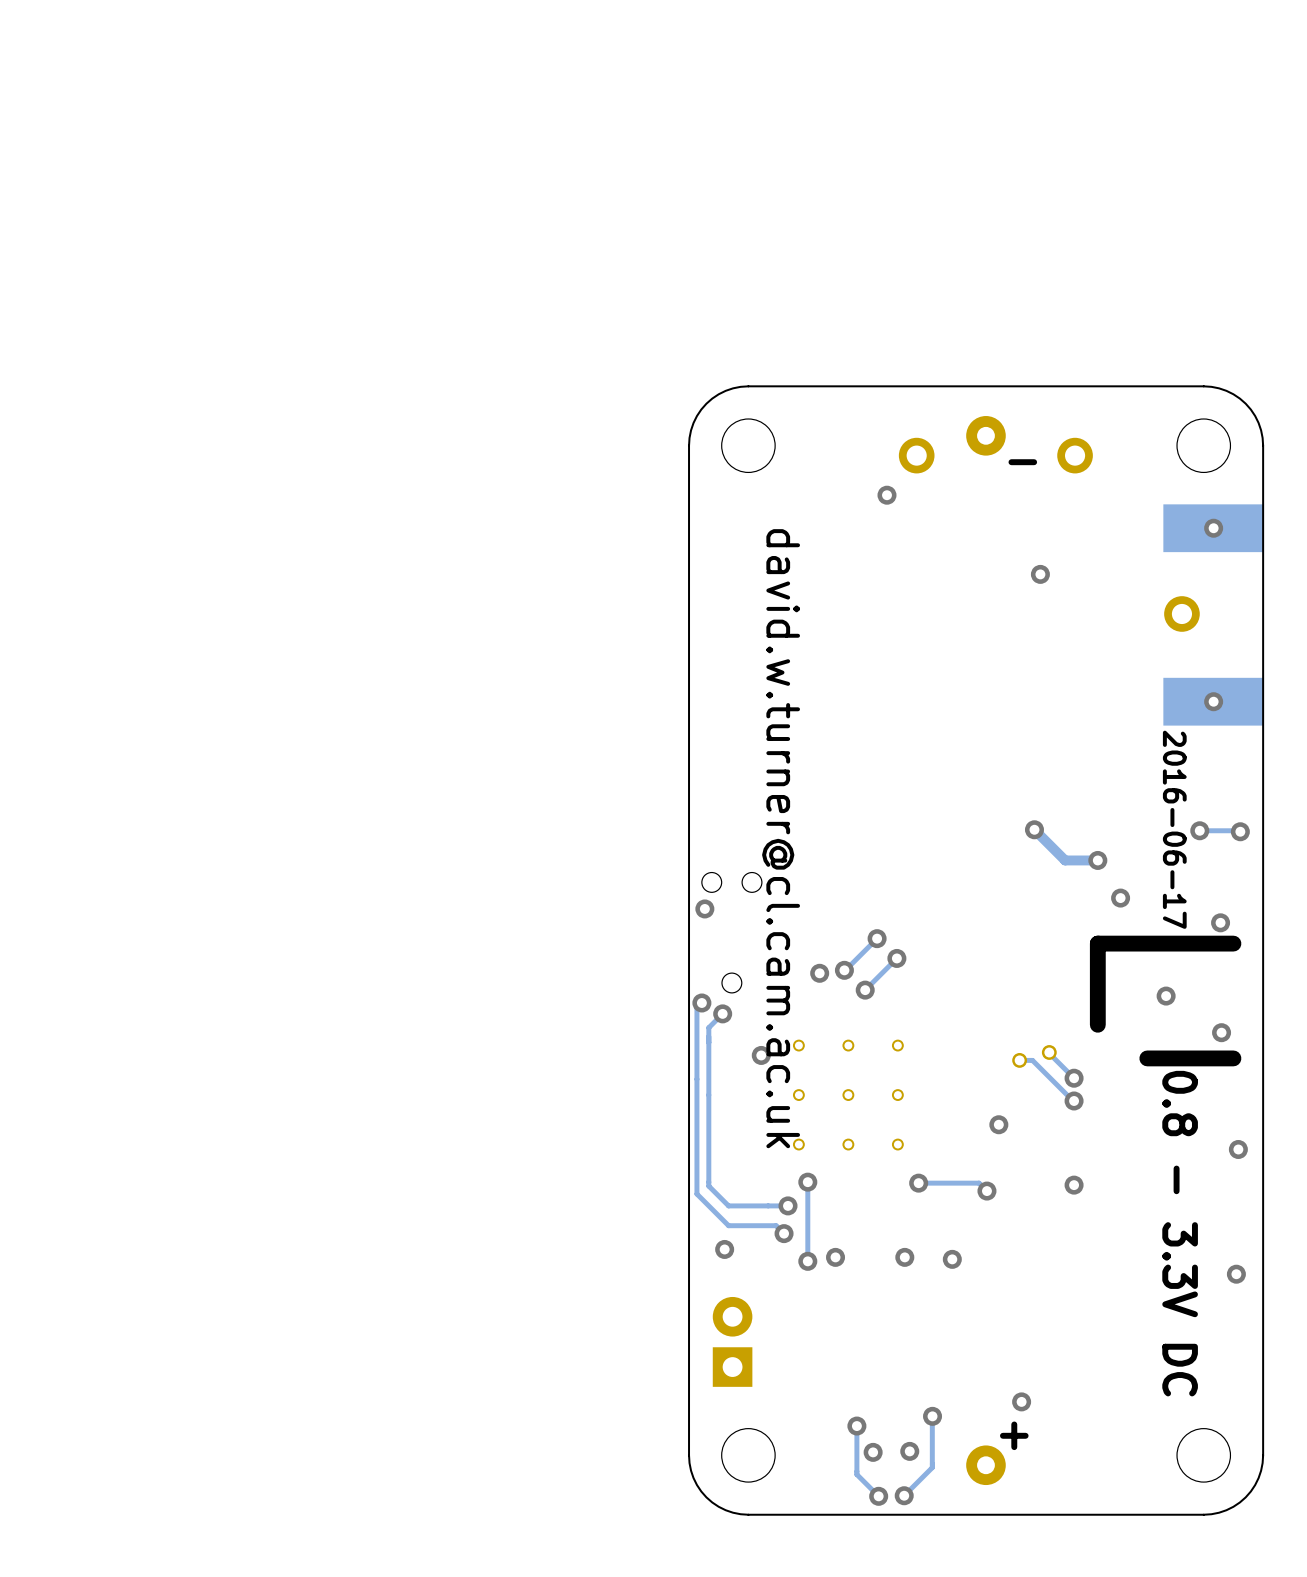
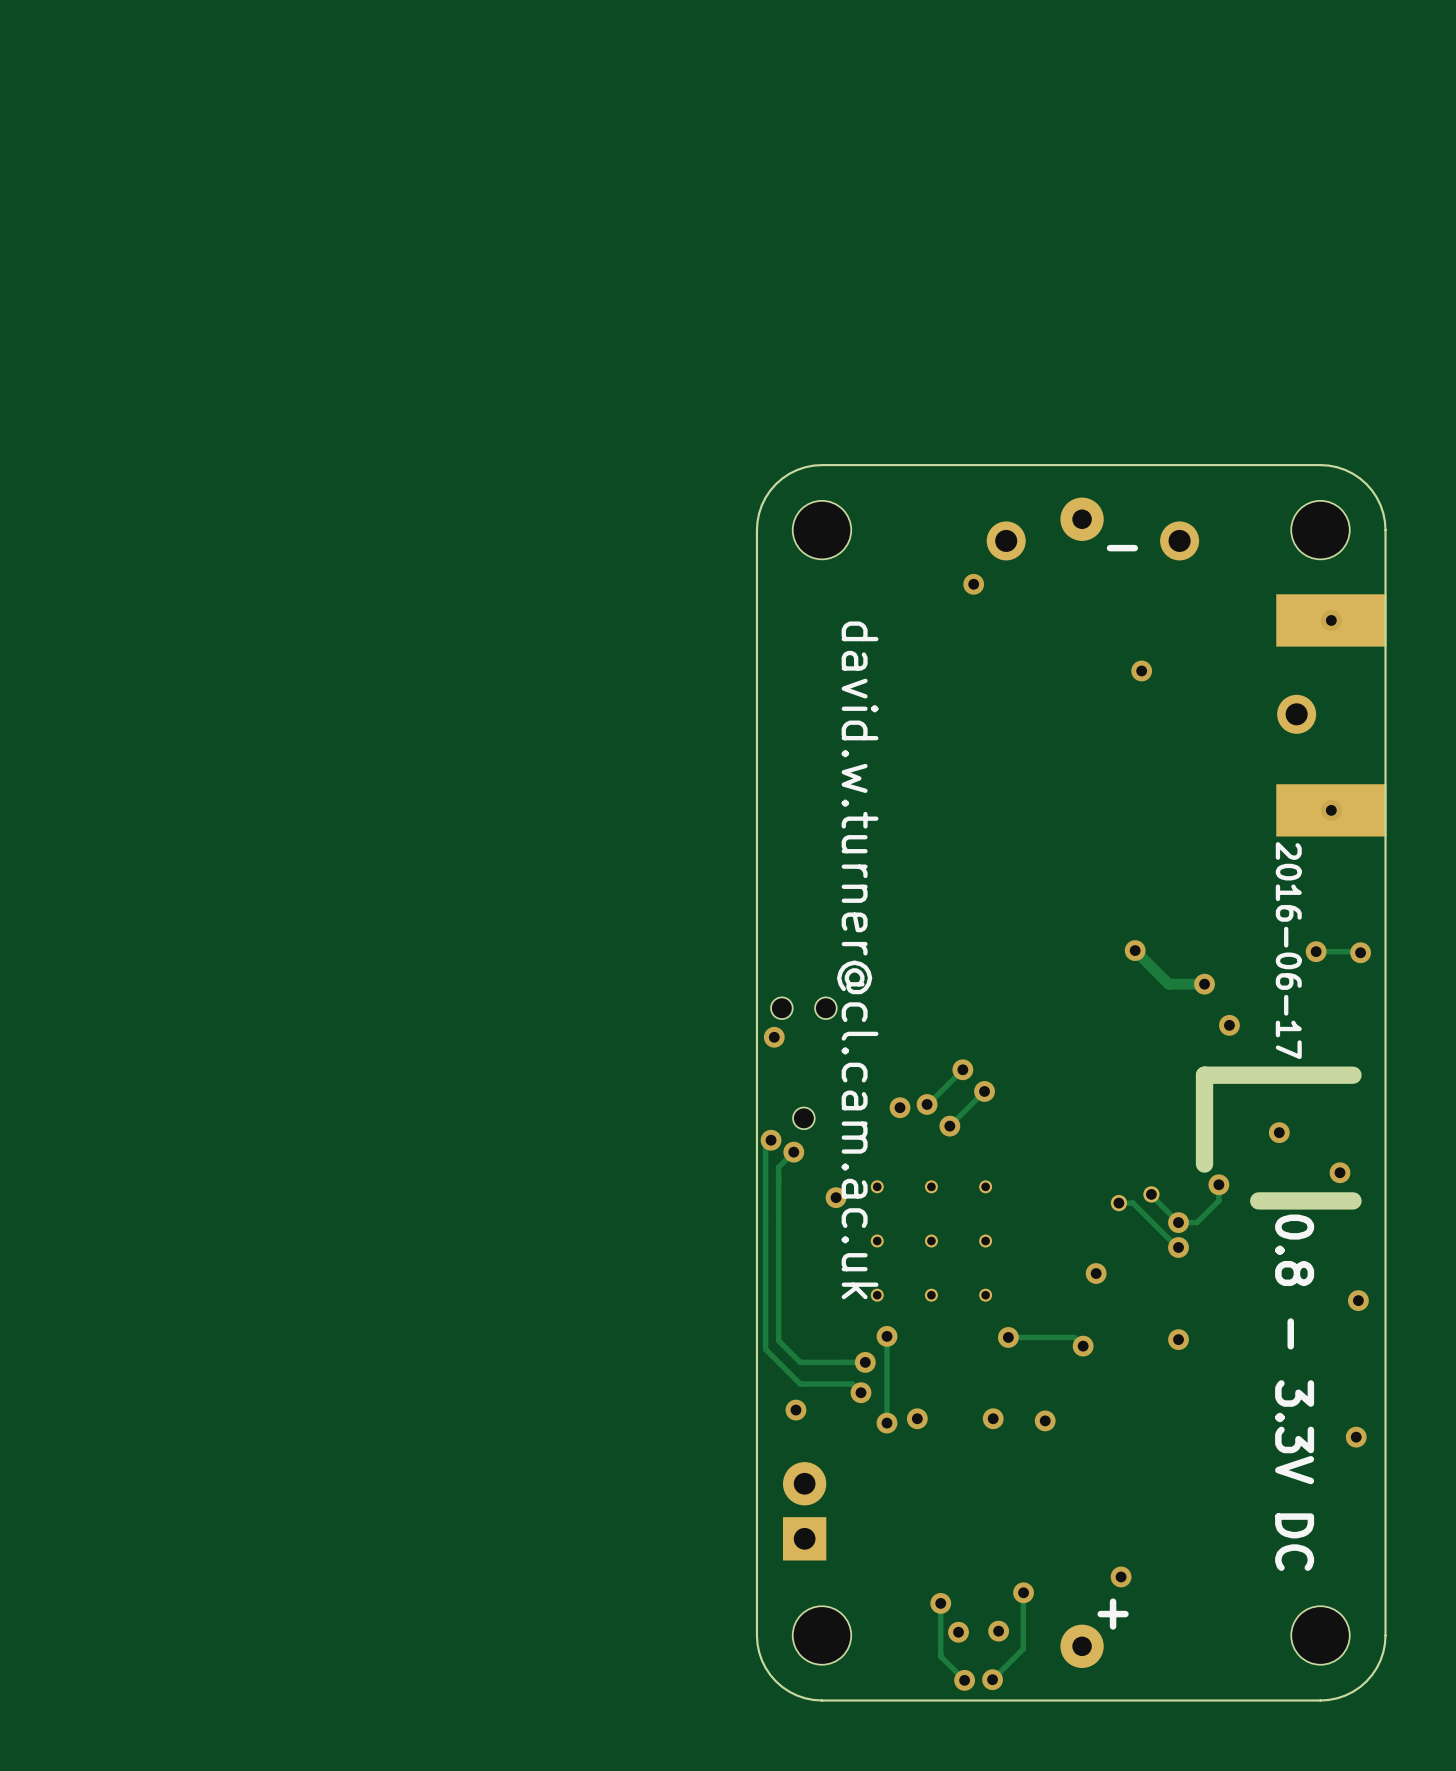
via: (1220, 922) -> none
track: none -> (1218, 1184) (1218, 1200) (1197, 1222) (1178, 1222)
via: none -> (1218, 1184)

